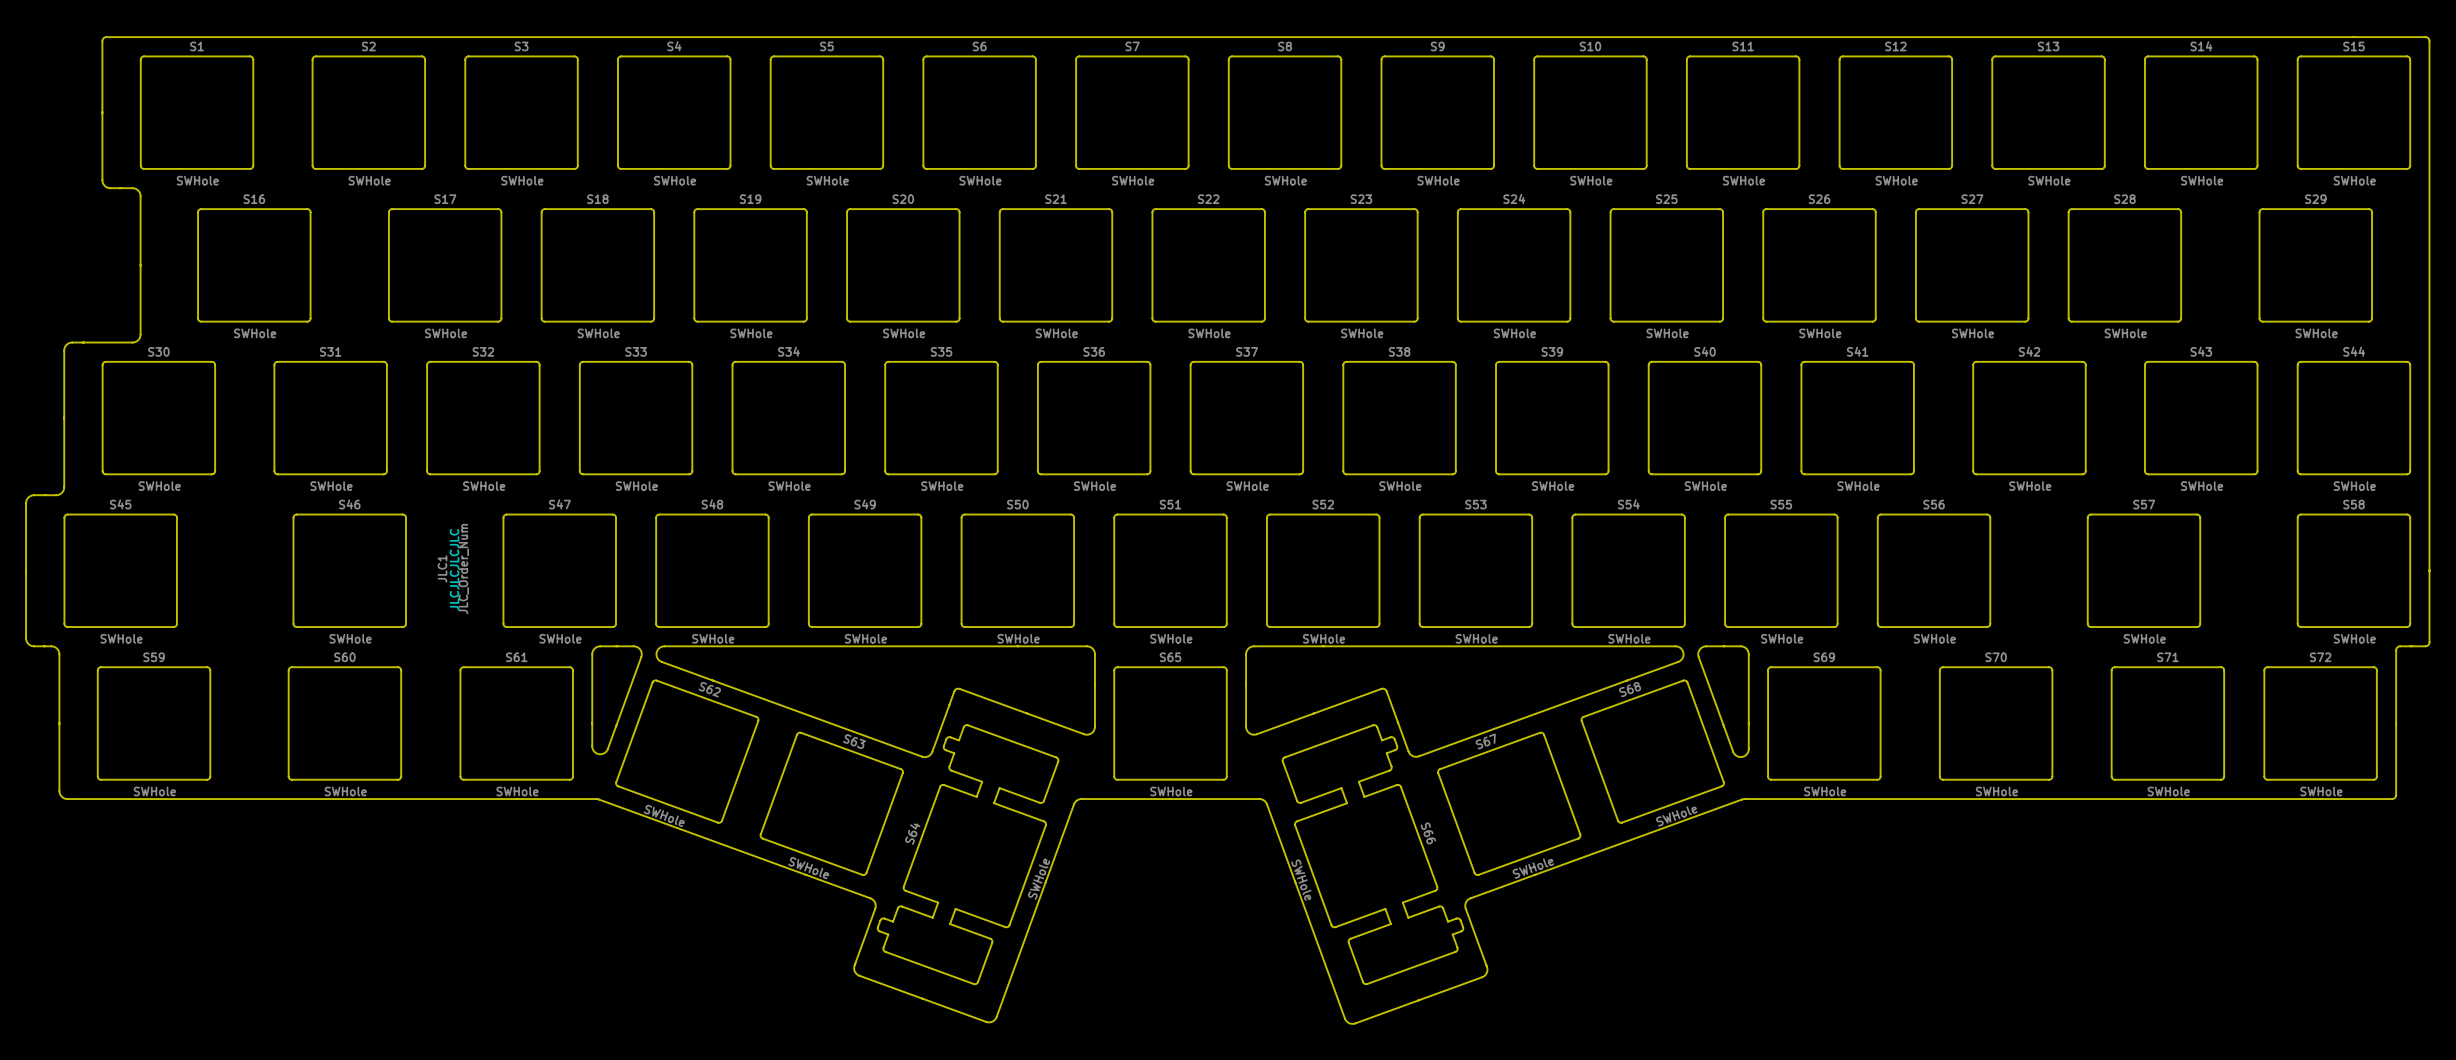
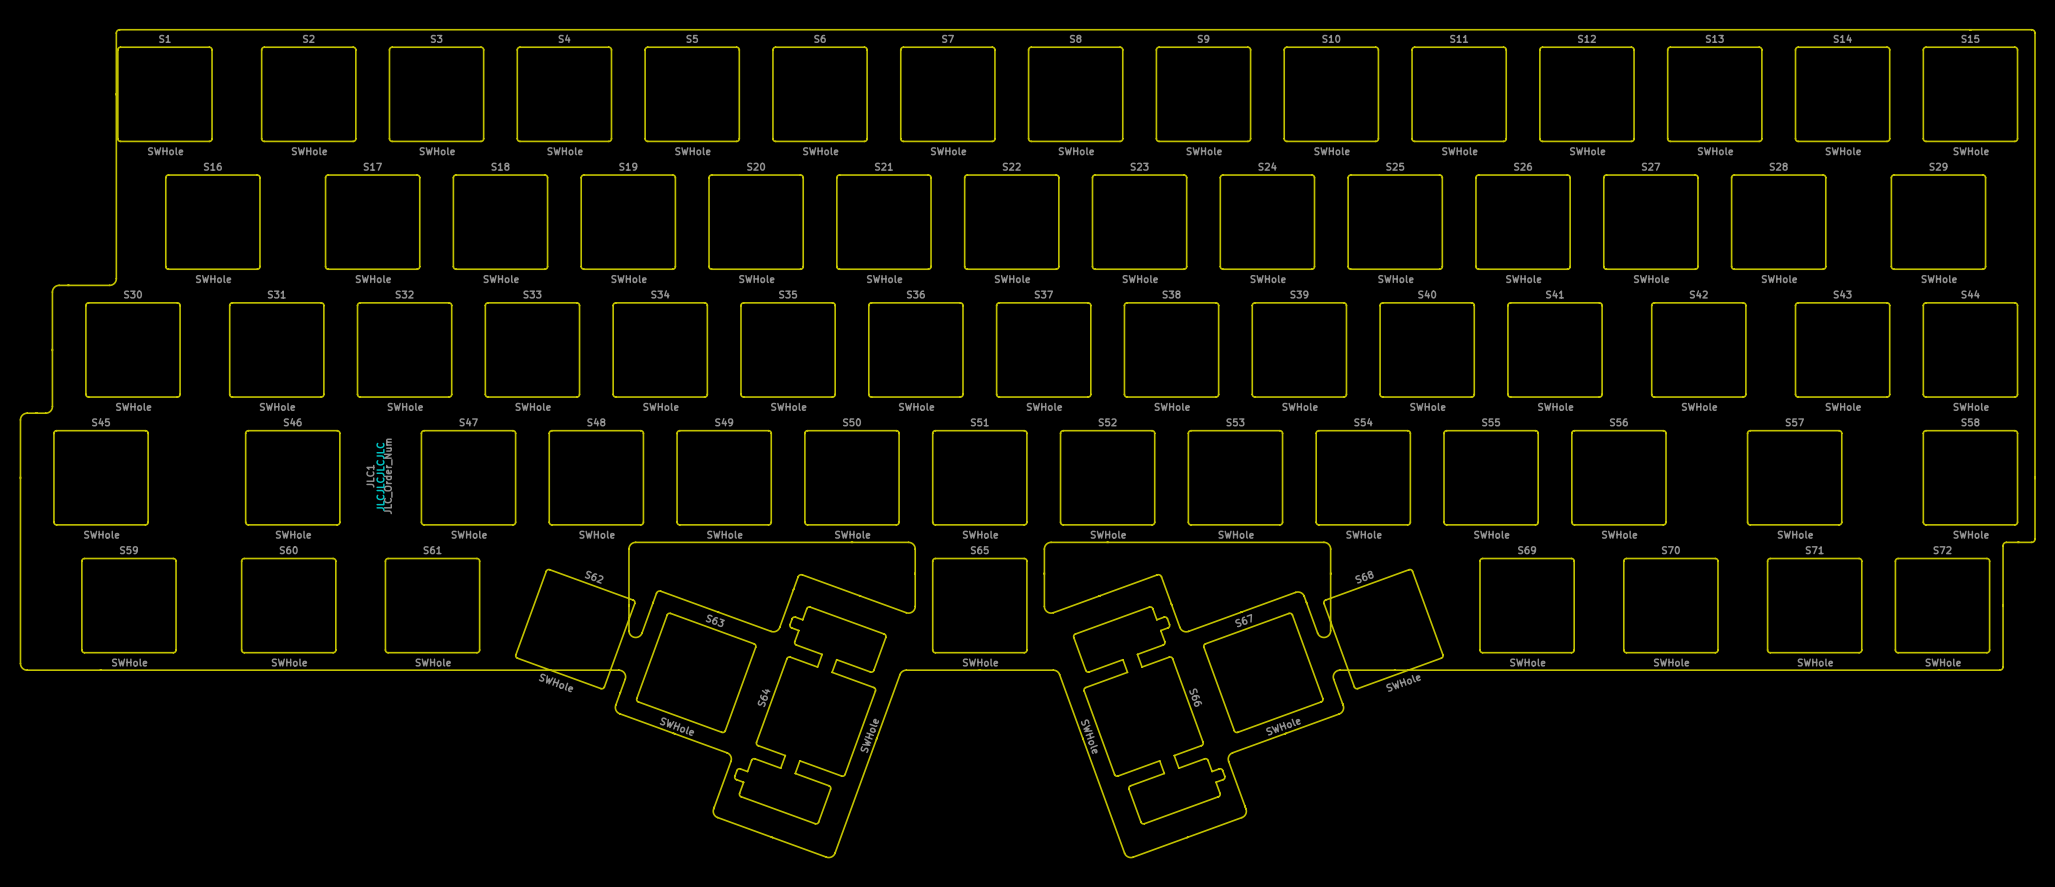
board edge: (600, 646) (635, 646) (640, 649) (641, 654) (607, 749) (604, 752) (599, 754) (595, 752) (592, 747) (592, 654) (594, 648) (600, 646) -> none
board edge: (664, 646) (1088, 646) (1094, 653) (1094, 728) (1090, 733) (1085, 734) (957, 688) (954, 691) (932, 752) (928, 756) (922, 756) (661, 661) (657, 657) (656, 652) (659, 647) (664, 646) -> (635, 542) (630, 544) (628, 549) (628, 630) (630, 634) (634, 637) (641, 633) (656, 593) (659, 591) (775, 631) (779, 628) (798, 576) (800, 574) (906, 612) (911, 612) (915, 607) (915, 548) (909, 542) (635, 542)
board edge: (1254, 646) (1675, 646) (1681, 649) (1683, 655) (1678, 661) (1416, 756) (1408, 752) (1386, 691) (1383, 688) (1256, 734) (1249, 733) (1246, 726) (1246, 654) (1248, 648) (1254, 646) -> (1051, 542) (1046, 544) (1044, 549) (1044, 607) (1048, 612) (1053, 612) (1158, 574) (1161, 576) (1180, 628) (1184, 631) (1297, 591) (1303, 595) (1318, 635) (1325, 637) (1330, 632) (1330, 549) (1326, 542) (1051, 542)
board edge: (1706, 646) (1741, 646) (1748, 651) (1748, 749) (1747, 753) (1743, 756) (1738, 756) (1733, 752) (1698, 657) (1699, 649) (1706, 646) -> none
board edge: (1482, 977) (1486, 973) (1487, 968) (1465, 907) (1468, 899) (1743, 799) (2394, 797) (2396, 649) (2399, 646) (2426, 646) (2429, 642) (2428, 38) (106, 37) (103, 38) (102, 181) (107, 187) (134, 188) (140, 194) (140, 334) (138, 339) (133, 342) (72, 342) (65, 346) (64, 488) (57, 495) (31, 495) (26, 502) (26, 639) (31, 645) (53, 646) (59, 652) (59, 790) (62, 797) (67, 799) (598, 799) (871, 898) (875, 902) (875, 907) (854, 966) (856, 973) (988, 1022) (996, 1017) (1076, 801) (1081, 799) (1260, 799) (1266, 804) (1344, 1018) (1349, 1023) (1355, 1023) -> (1240, 818) (1245, 814) (1246, 809) (1228, 761) (1229, 755) (1341, 712) (1343, 706) (1333, 677) (1334, 673) (1338, 670) (2002, 669) (2003, 544) (2006, 542) (2032, 542) (2035, 539) (2034, 30) (117, 31) (116, 280) (110, 285) (59, 285) (53, 288) (52, 407) (47, 413) (24, 413) (20, 419) (20, 663) (23, 668) (620, 670) (624, 673) (625, 677) (615, 705) (617, 712) (730, 755) (730, 761) (713, 809) (715, 816) (828, 857) (835, 853) (901, 671) (906, 670) (1054, 670) (1059, 674) (1124, 853) (1128, 857) (1134, 856)

